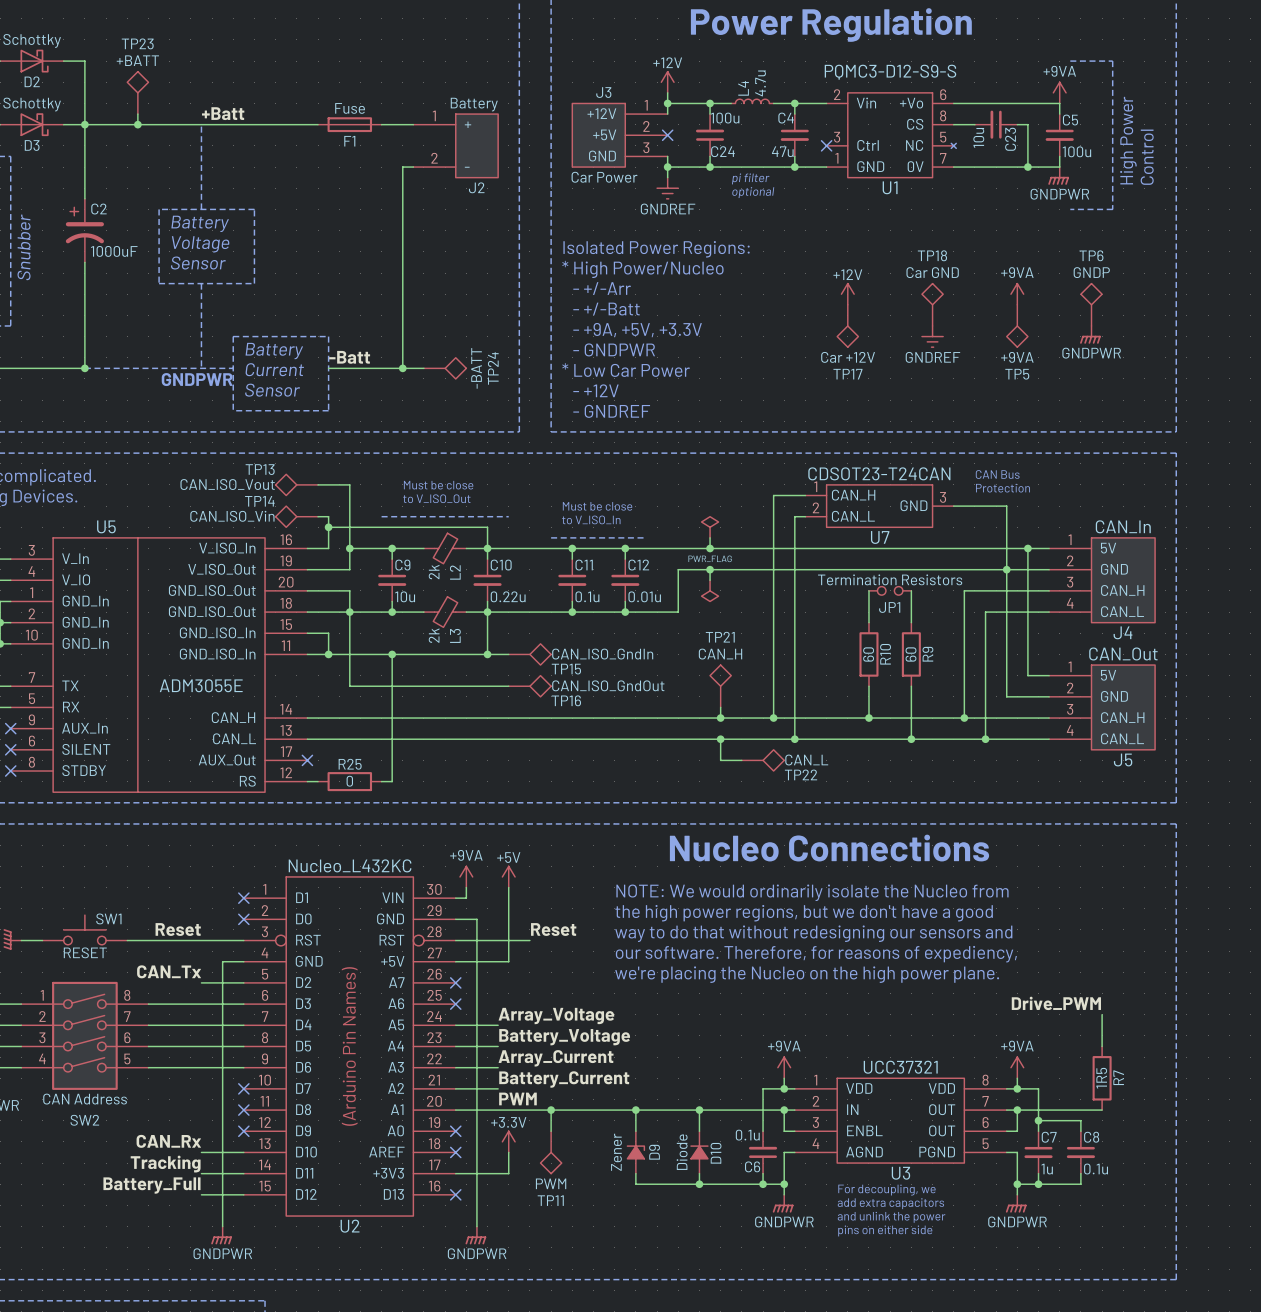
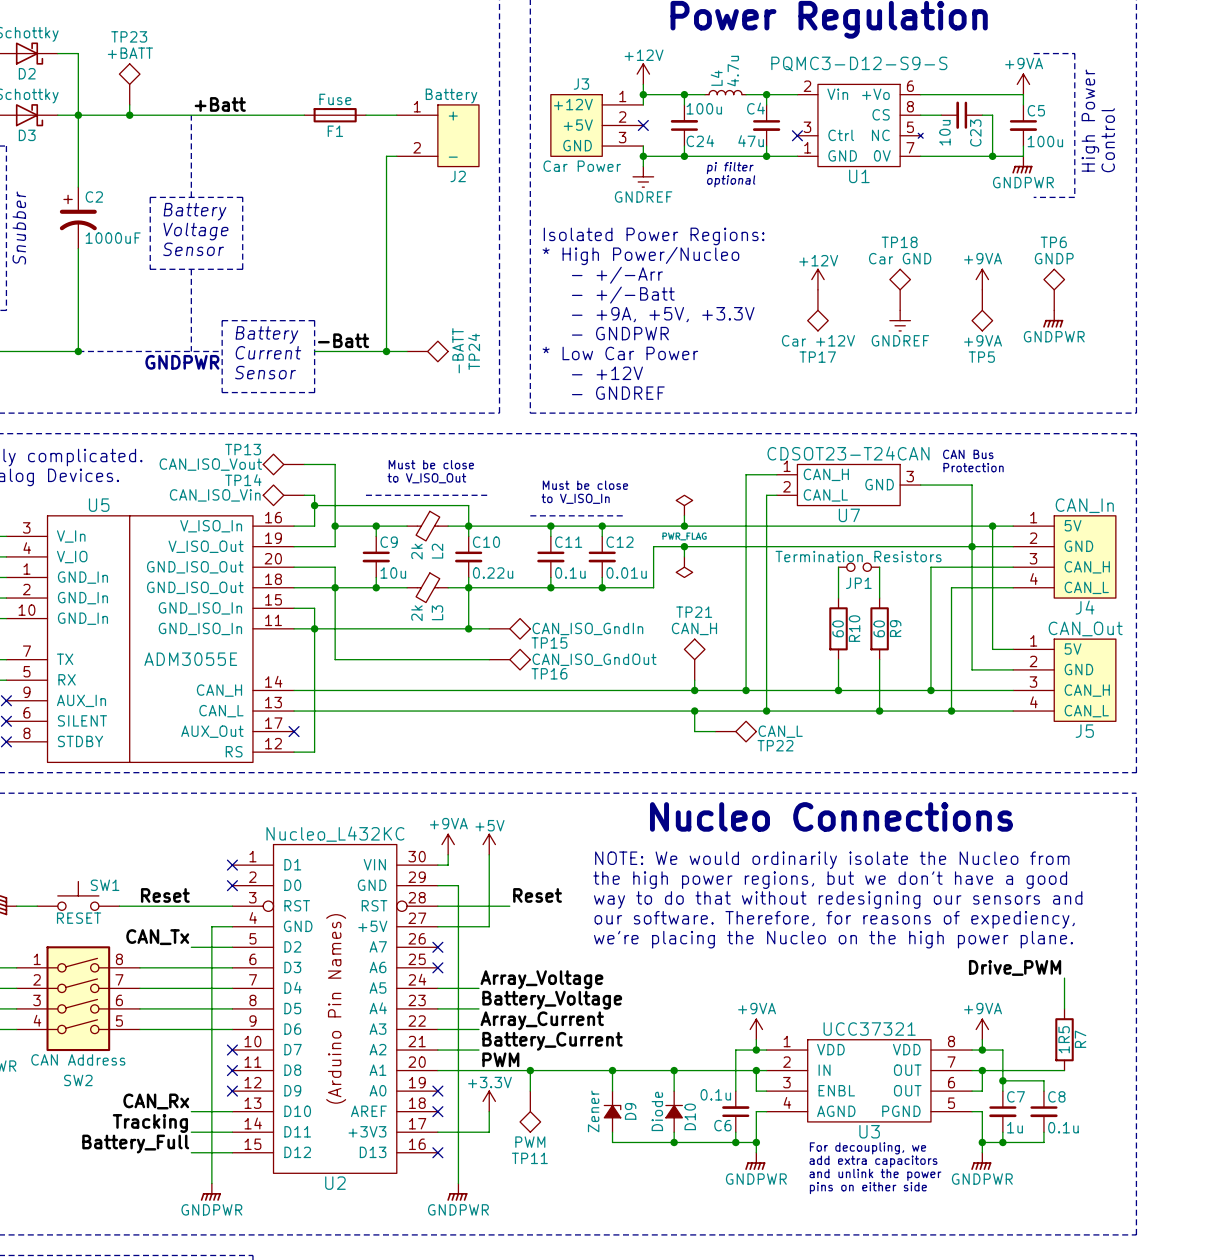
wire: (392, 654) (392, 781) (381, 781) -> (314, 628) (314, 752) (304, 752)
junction: (392, 654) -> none
R25: 0 (349, 781) -> none

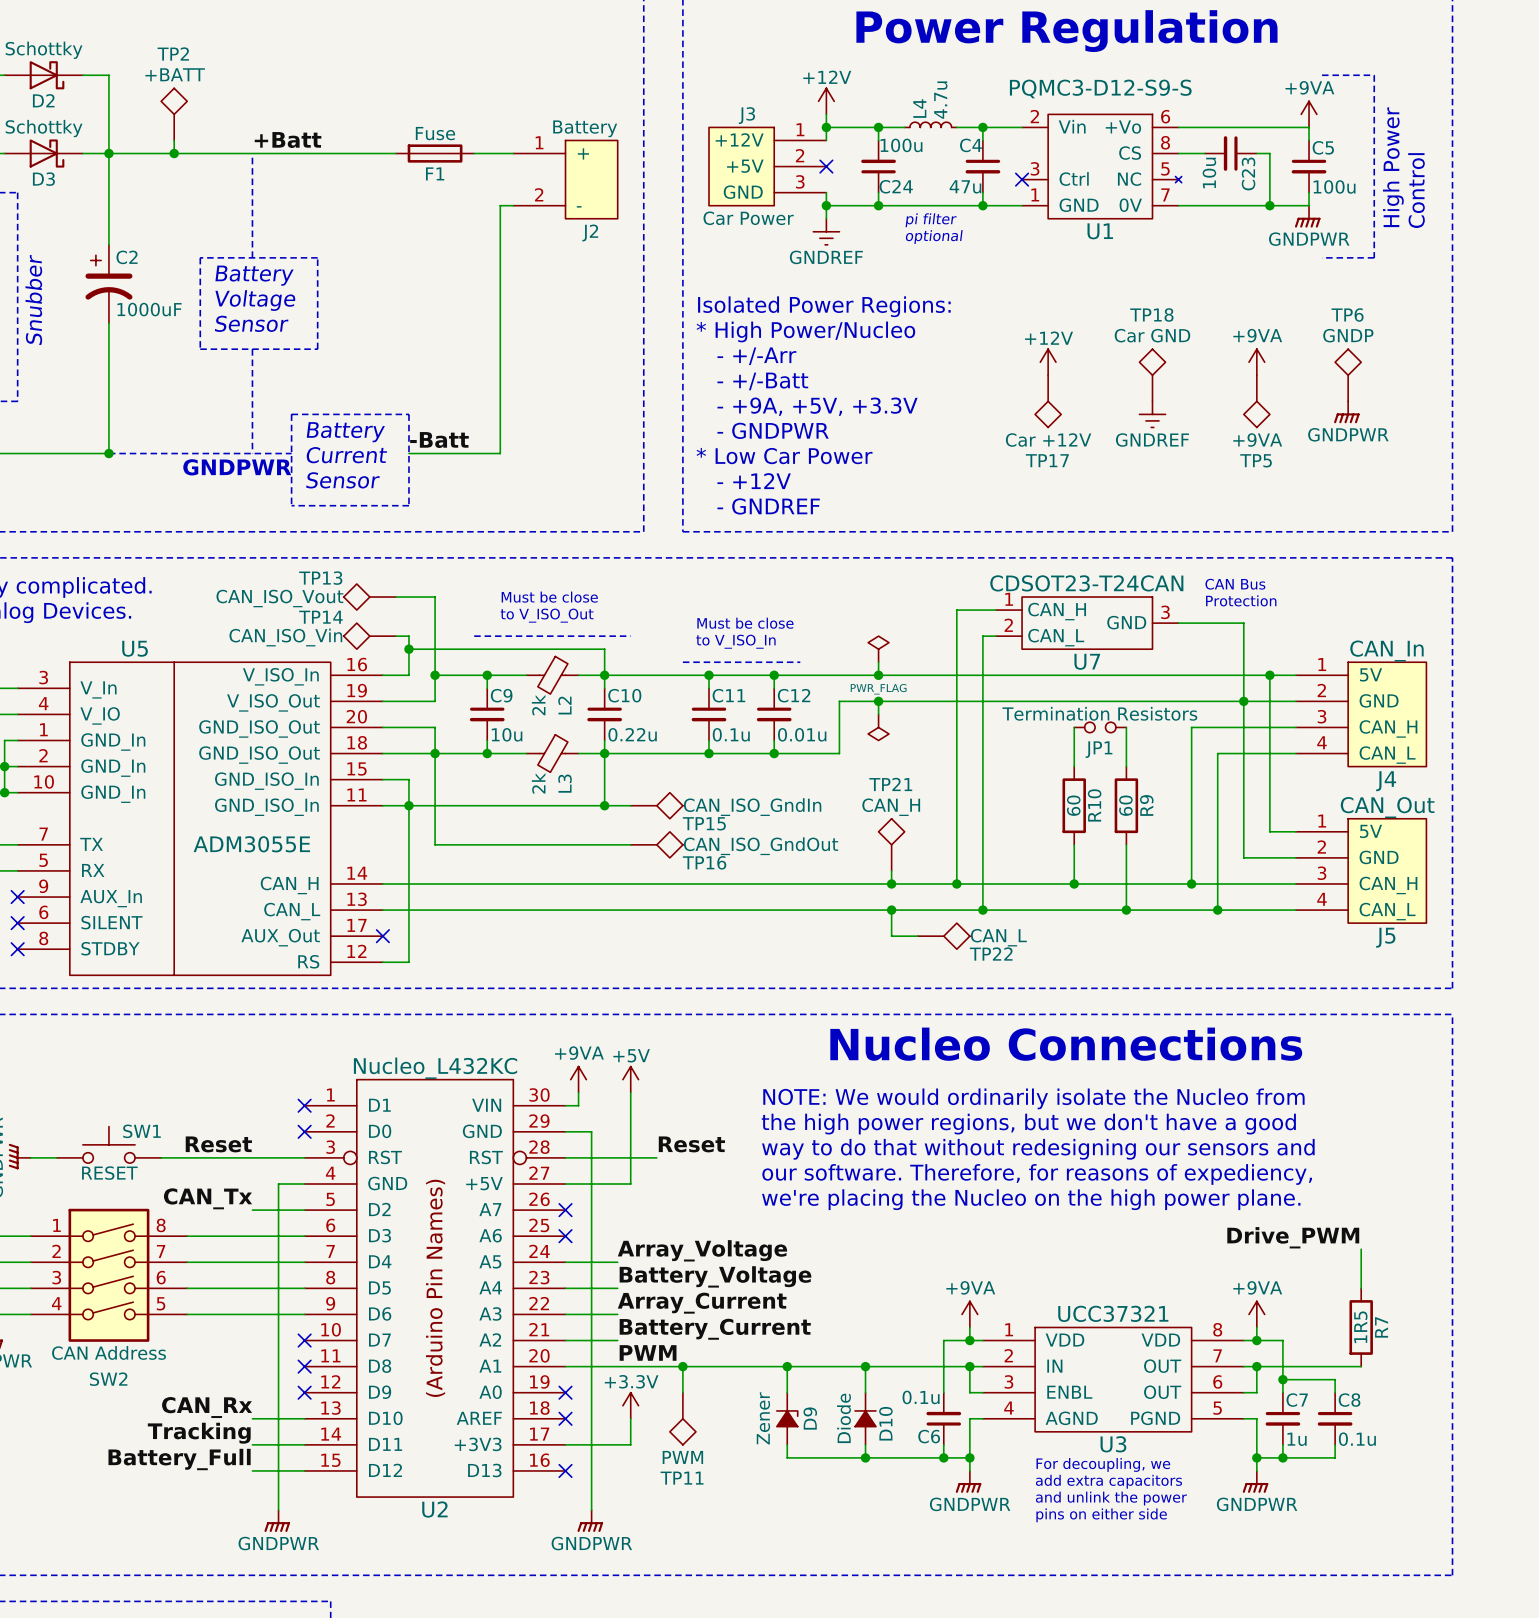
TP23 name: TP23 (129, 36) -> TP2 (173, 53)
wire: (386, 351) (407, 351) -> none
junction: (386, 351) -> none
TP24: -BATT (427, 351) -> none

